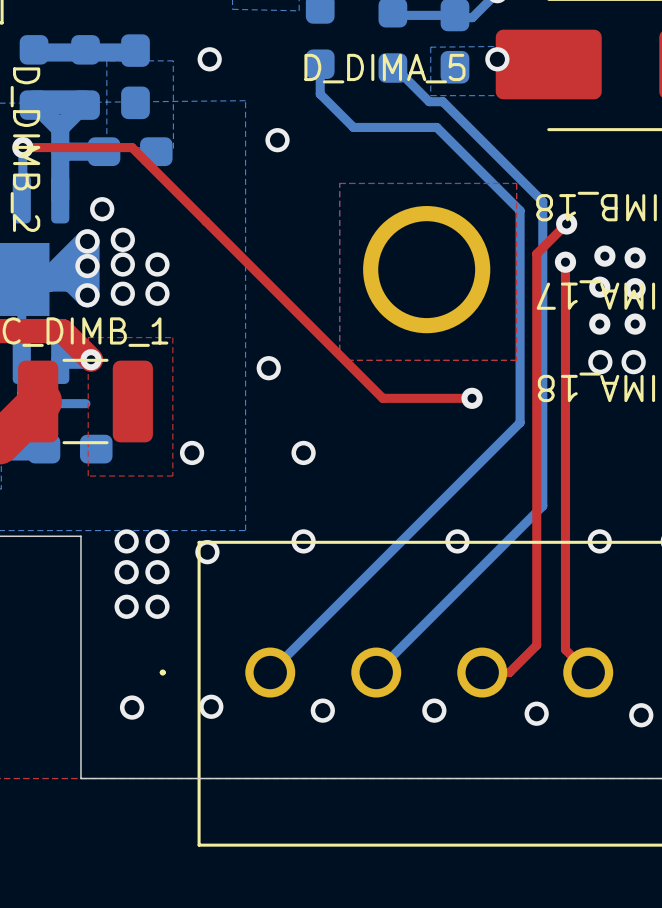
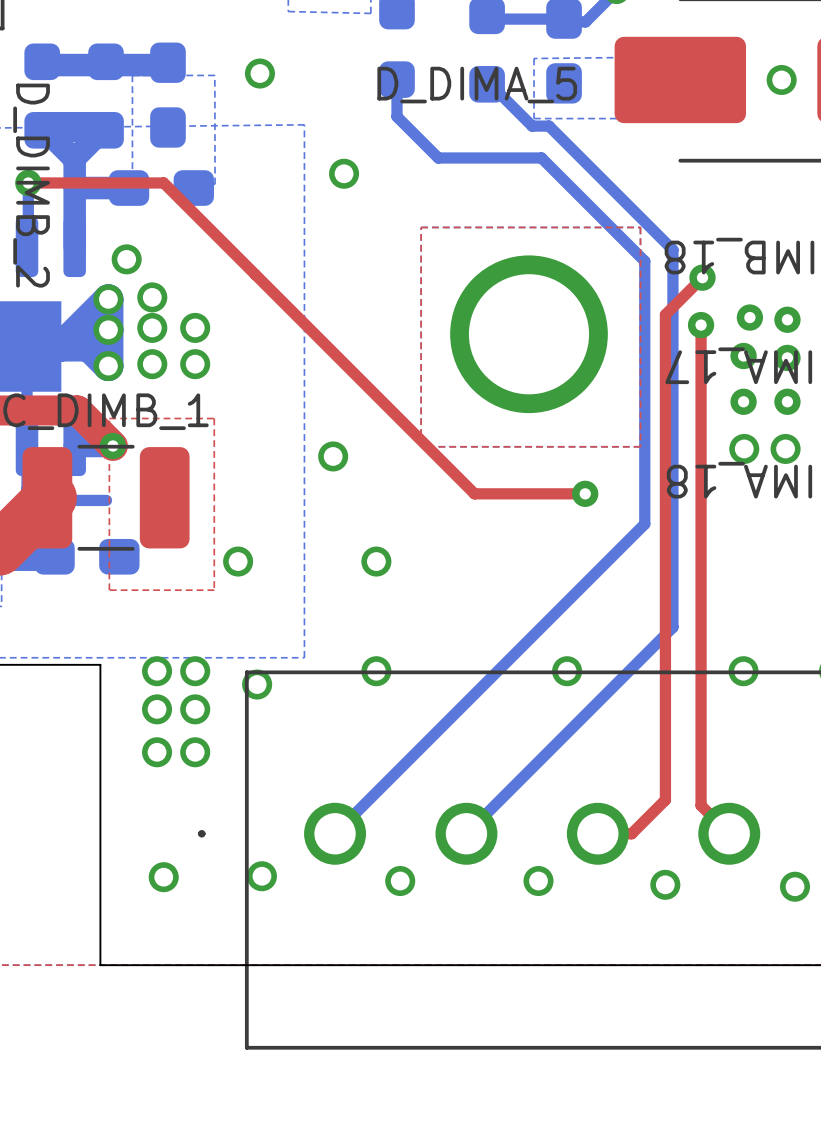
via position: (497, 59) -> (781, 79)

